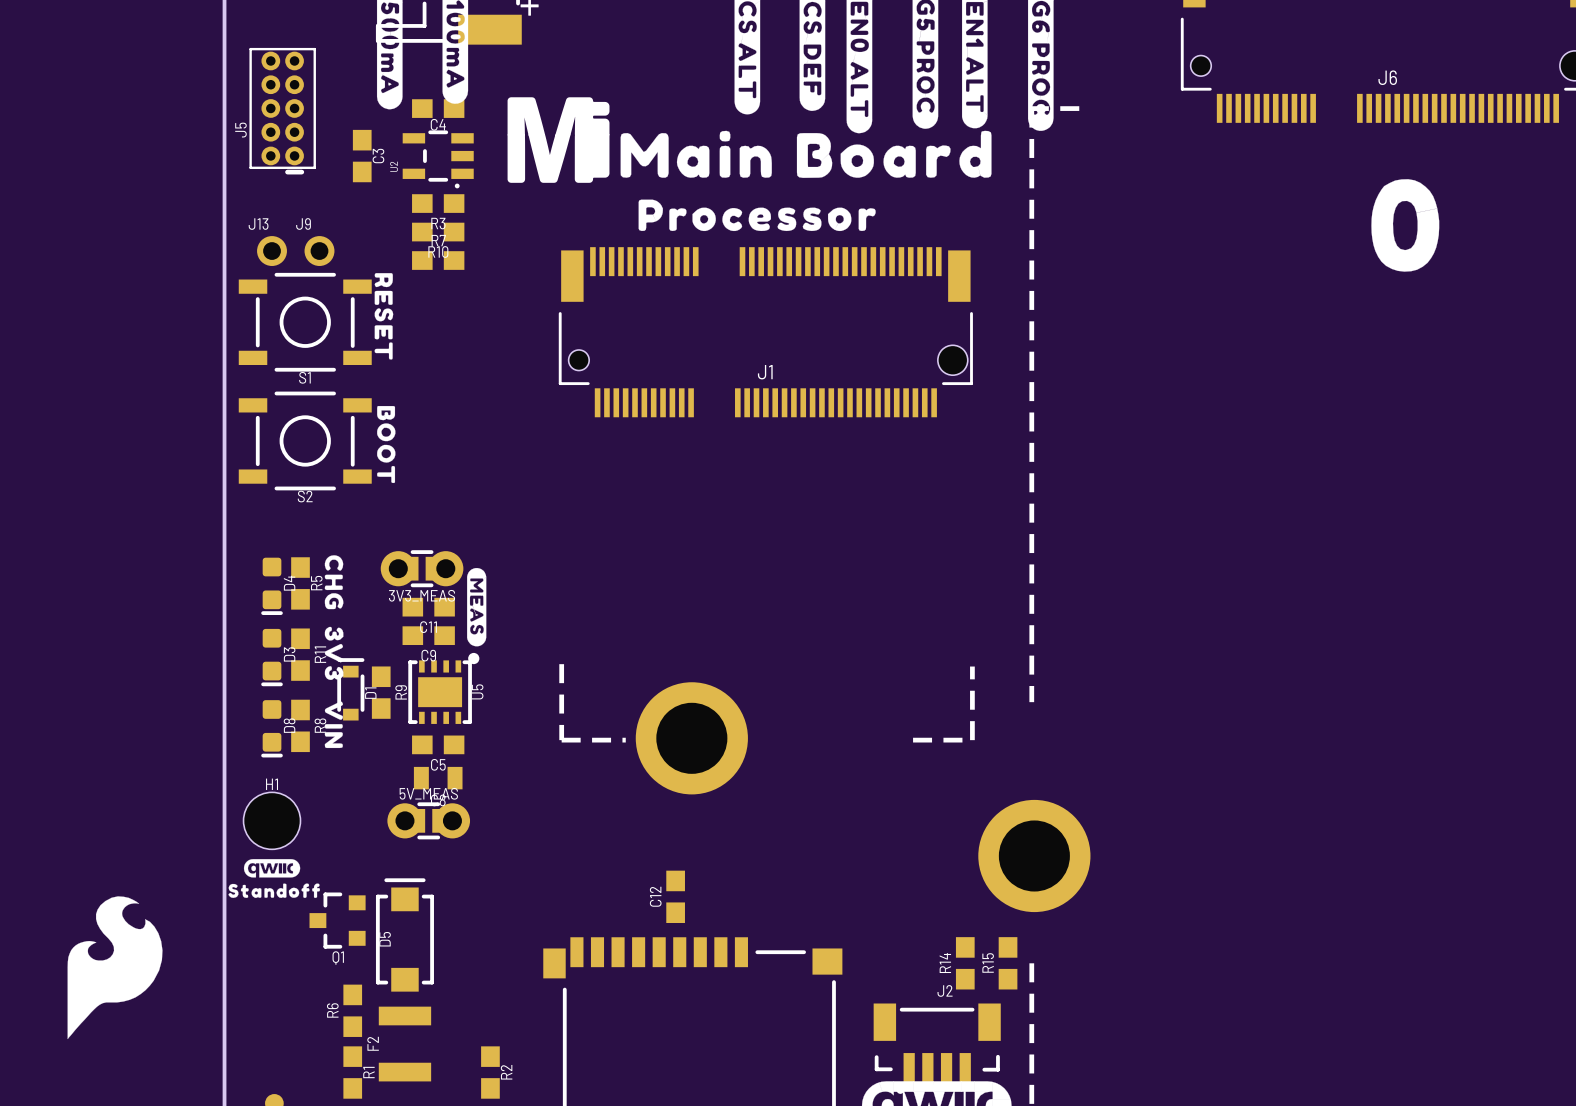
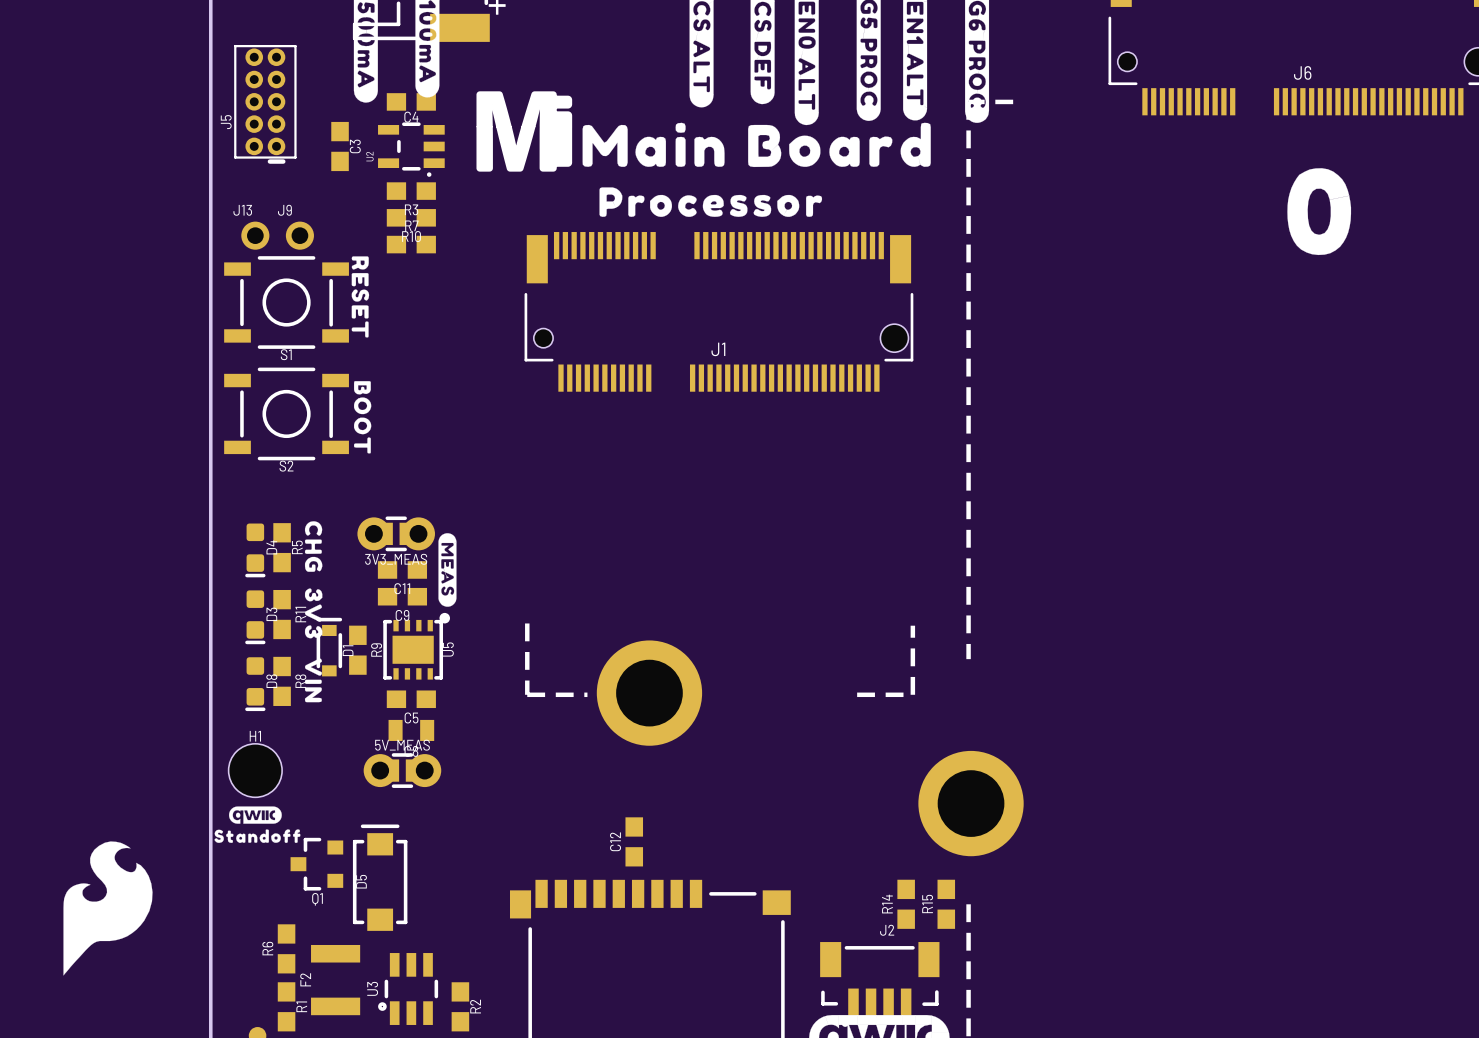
R6 position: (352, 1010) -> (286, 948)
F2 position: (404, 1044) -> (335, 980)
U3: none -> (408, 988)
R1 position: (352, 1072) -> (286, 1006)

